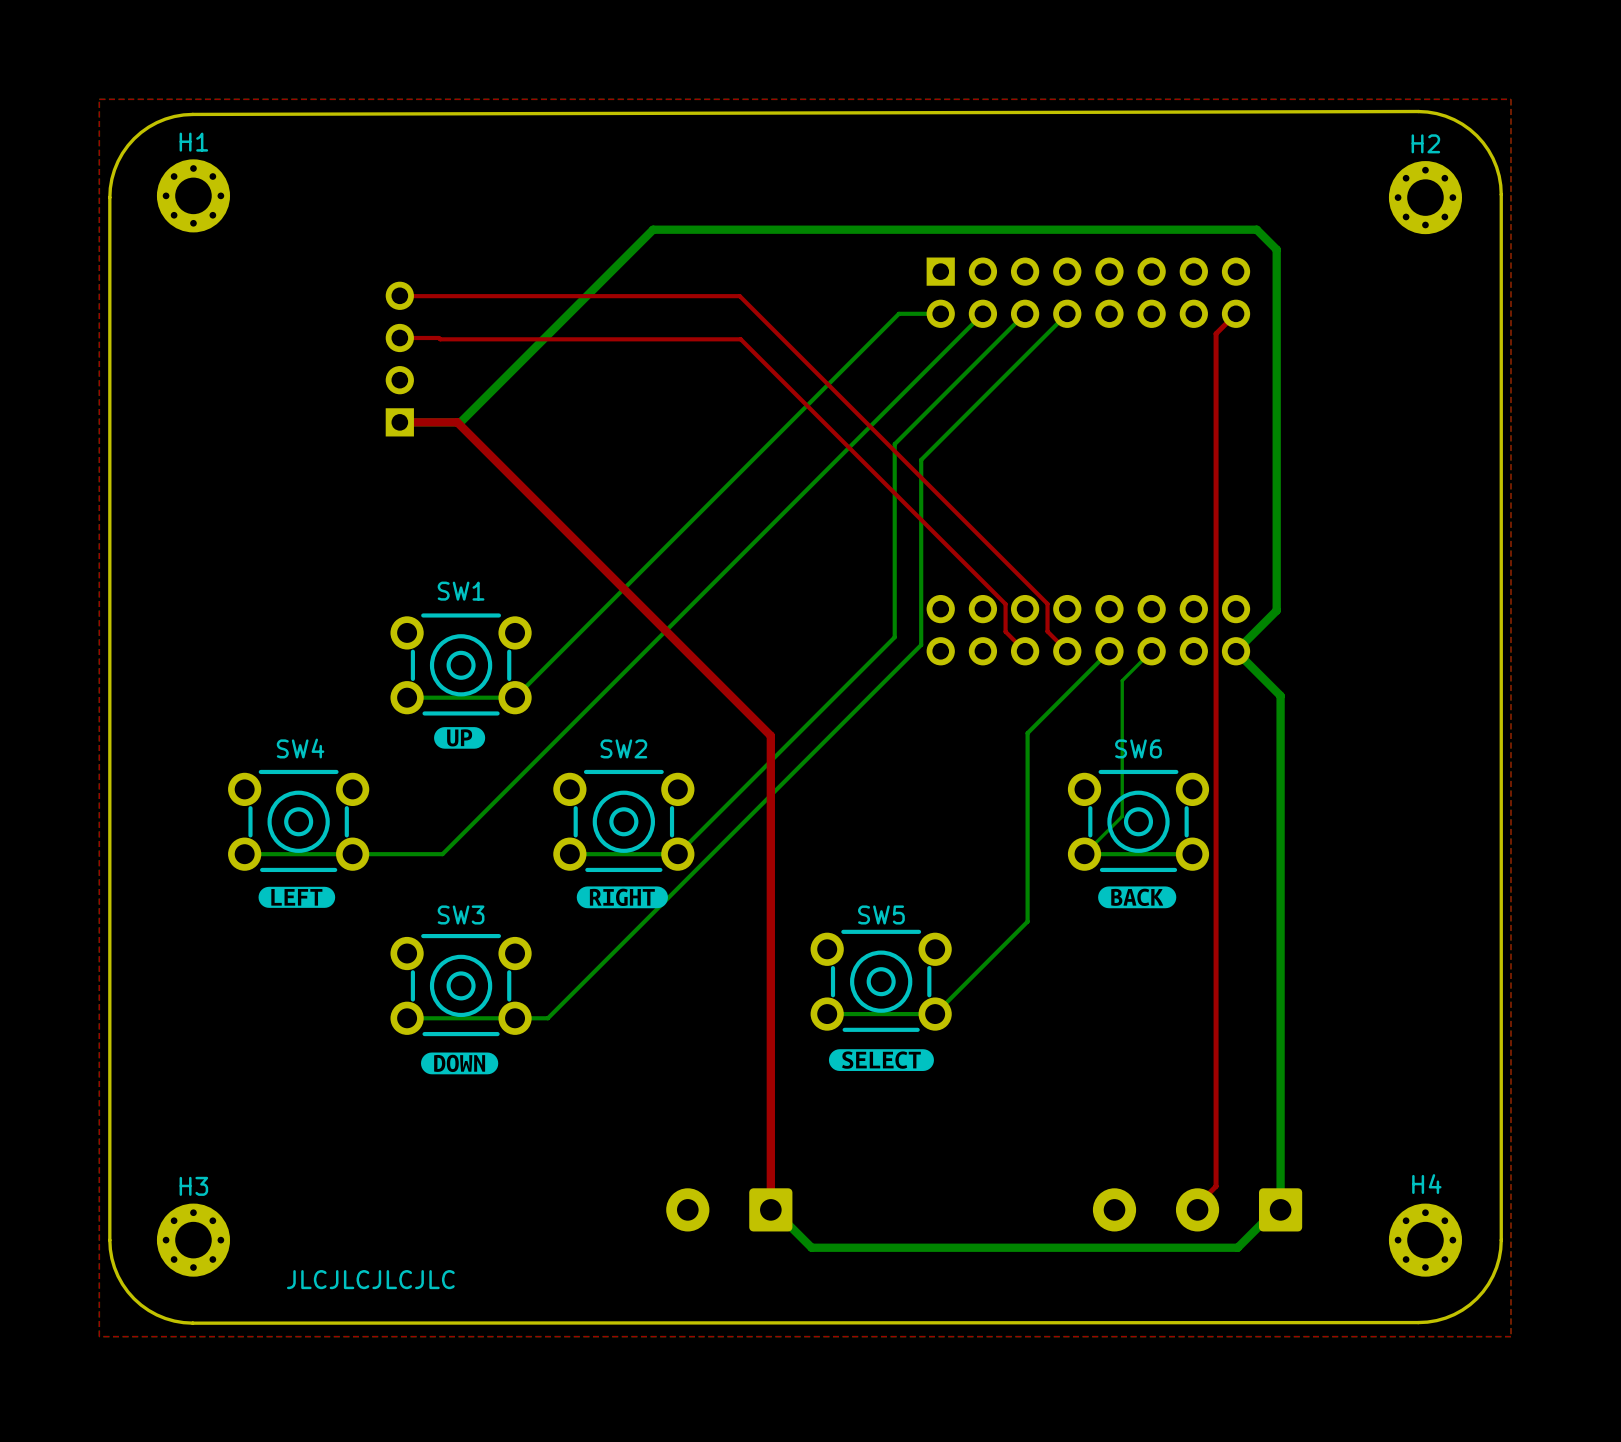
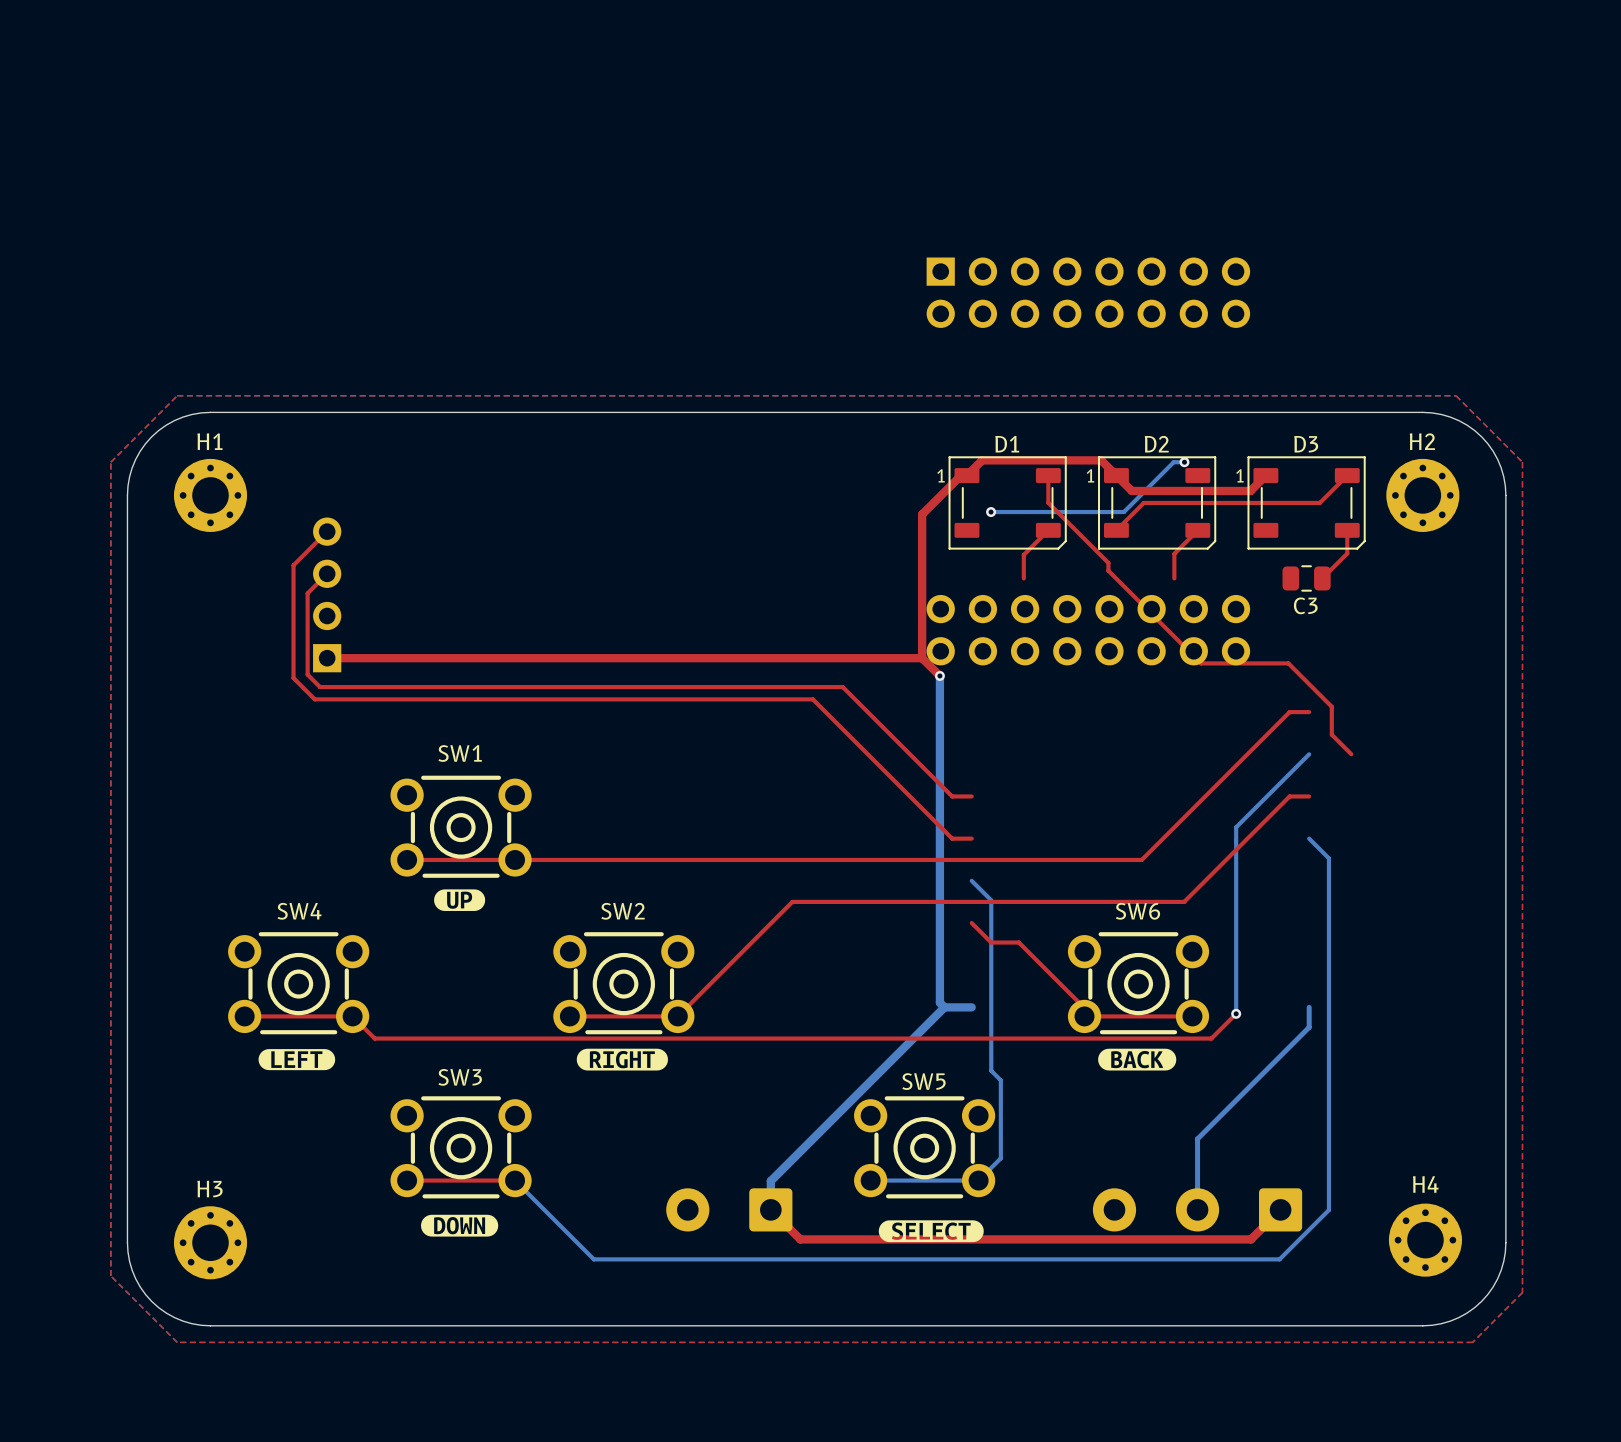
top zone outline: (99, 99) (1510, 99) (1510, 1336) (99, 1336) (99, 99) -> (177, 395) (110, 462) (110, 1275) (177, 1342) (1472, 1342) (1522, 1292) (1522, 462) (1456, 395) (177, 395)
board edge: (1418, 111) (192, 114) (165, 119) (148, 127) (134, 138) (122, 153) (114, 170) (109, 197) (109, 1240) (114, 1267) (122, 1284) (134, 1298) (156, 1314) (174, 1321) (192, 1323) (1418, 1322) (1445, 1318) (1462, 1310) (1476, 1298) (1488, 1284) (1496, 1267) (1501, 1240) (1501, 194) (1499, 176) (1493, 158) (1476, 135) (1454, 119) (1436, 113) (1418, 111) -> (210, 412) (192, 414) (174, 420) (151, 436) (140, 451) (132, 468) (127, 495) (127, 1242) (129, 1261) (135, 1278) (145, 1294) (166, 1313) (183, 1321) (210, 1325) (1422, 1325) (1450, 1321) (1467, 1313) (1481, 1301) (1493, 1286) (1501, 1270) (1505, 1242) (1505, 495) (1501, 468) (1493, 451) (1481, 436) (1467, 425) (1450, 417) (1422, 412) (210, 412)
H1 position: (193, 195) -> (210, 495)
H2 position: (1425, 197) -> (1422, 495)
top track: (399, 295) (739, 296) (1047, 603) (1047, 631) (1067, 651) -> none
bottom track: (940, 313) (898, 313) (515, 697) (407, 697) -> none
bottom track: (982, 313) (442, 854) (244, 854) -> none
bottom track: (1025, 313) (894, 444) (894, 637) (677, 854) (569, 854) -> none
bottom track: (1067, 313) (921, 459) (921, 645) (547, 1018) (407, 1018) -> none
top track: (1236, 313) (1216, 333) (1216, 1186) (1197, 1204) -> none
top track: (399, 337) (740, 339) (1005, 604) (1005, 631) (1025, 651) -> none
part position: (399, 359) -> (327, 594)
bottom track: (399, 422) (460, 422) (653, 229) (1256, 229) (1276, 249) (1276, 610) (1236, 651) (1280, 695) (1280, 1204) (1237, 1247) (811, 1247) (770, 1206) -> none
top track: (399, 424) (399, 422) (457, 422) (770, 735) (770, 1206) -> none
bottom track: none -> (1184, 462) (1173, 462) (1123, 512) (991, 512)
via: none -> (1184, 462)
top track: none -> (1048, 475) (1048, 502) (1108, 562) (1108, 570) (1201, 663) (1288, 663) (1331, 706) (1331, 734) (1351, 754)
top track: none -> (1265, 475) (1250, 490) (1131, 490) (1101, 460) (982, 460) (966, 475) (961, 475) (922, 514) (922, 658)
top track: none -> (1347, 475) (1319, 502) (1143, 502) (1116, 530)
D1: none -> (1007, 502)
D2: none -> (1157, 502)
D3: none -> (1306, 502)
via: none -> (991, 512)
top track: none -> (1048, 530) (1023, 554) (1023, 578)
top track: none -> (1197, 530) (1174, 553) (1174, 578)
top track: none -> (1347, 530) (1347, 553) (1322, 578)
top track: none -> (327, 531) (293, 565) (293, 678) (314, 699) (812, 699) (952, 838) (971, 838)
top track: none -> (327, 573) (307, 593) (307, 674) (320, 687) (842, 687) (952, 796) (971, 796)
C3: none -> (1306, 578)
bottom track: (1109, 651) (1027, 733) (1027, 921) (935, 1014) (827, 1014) -> none
bottom track: (1151, 651) (1122, 680) (1122, 816) (1084, 854) (1192, 854) -> none
top track: none -> (327, 658) (922, 658)
top track: none -> (922, 658) (939, 675)
SW1 position: (461, 664) -> (461, 826)
bottom track: none -> (939, 675) (939, 1002) (944, 1007)
via: none -> (939, 675)
top track: none -> (1309, 712) (1289, 712) (1141, 859) (407, 859)
drawing position: (459, 737) -> (459, 900)
bottom track: none -> (1309, 754) (1236, 827) (1236, 1013)
top track: none -> (1309, 796) (1289, 796) (1184, 901) (792, 901) (677, 1016) (569, 1016)
SW4 position: (298, 820) -> (298, 983)
SW2 position: (623, 820) -> (623, 983)
SW6 position: (1138, 820) -> (1138, 983)
bottom track: none -> (1309, 838) (1328, 858) (1328, 1210) (1279, 1259) (593, 1259) (515, 1180)
bottom track: none -> (971, 880) (991, 900) (991, 1070) (1000, 1080) (1000, 1158) (978, 1180) (870, 1180)
drawing position: (296, 897) -> (296, 1059)
drawing position: (622, 897) -> (622, 1059)
drawing position: (1137, 897) -> (1137, 1059)
top track: none -> (971, 923) (991, 942) (1018, 942) (1084, 1008) (1084, 1016) (1192, 1016)
SW5 position: (881, 980) -> (924, 1147)
SW3 position: (461, 985) -> (461, 1147)
bottom track: none -> (944, 1007) (971, 1007)
bottom track: none -> (944, 1007) (770, 1181) (770, 1209)
bottom track: none -> (1309, 1007) (1309, 1027) (1197, 1138) (1197, 1209)
top track: none -> (1236, 1013) (1211, 1038) (374, 1038) (352, 1016) (244, 1016)
via: none -> (1236, 1013)
drawing position: (881, 1060) -> (931, 1231)
drawing position: (459, 1063) -> (459, 1225)
top track: none -> (407, 1180) (515, 1180)
top track: none -> (770, 1209) (800, 1239) (1251, 1239) (1280, 1209)
H3 position: (193, 1240) -> (210, 1242)
text: JLCJLCJLCJLC (370, 1279) -> none

